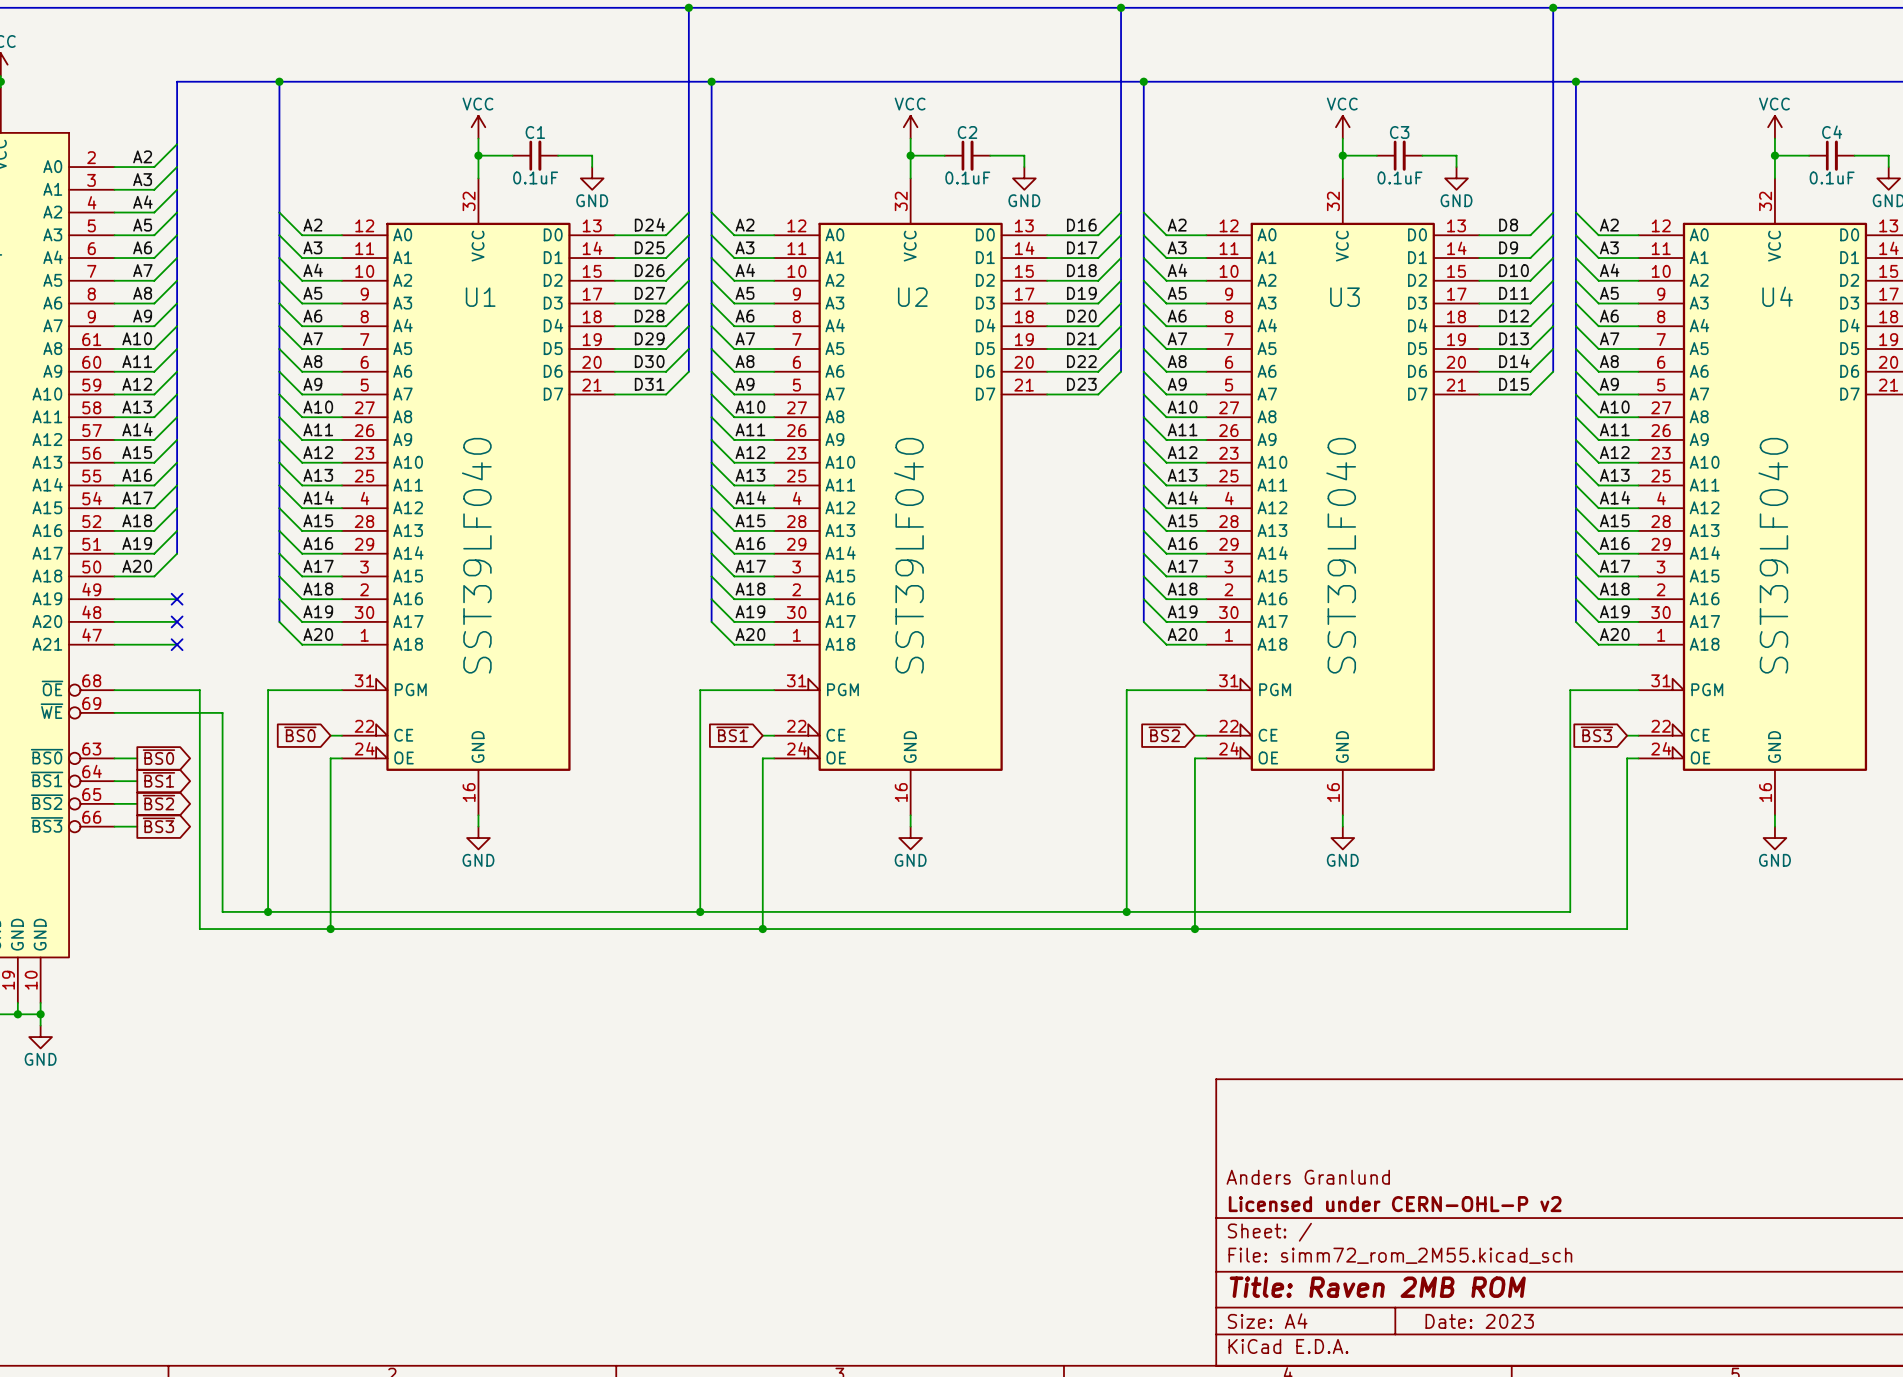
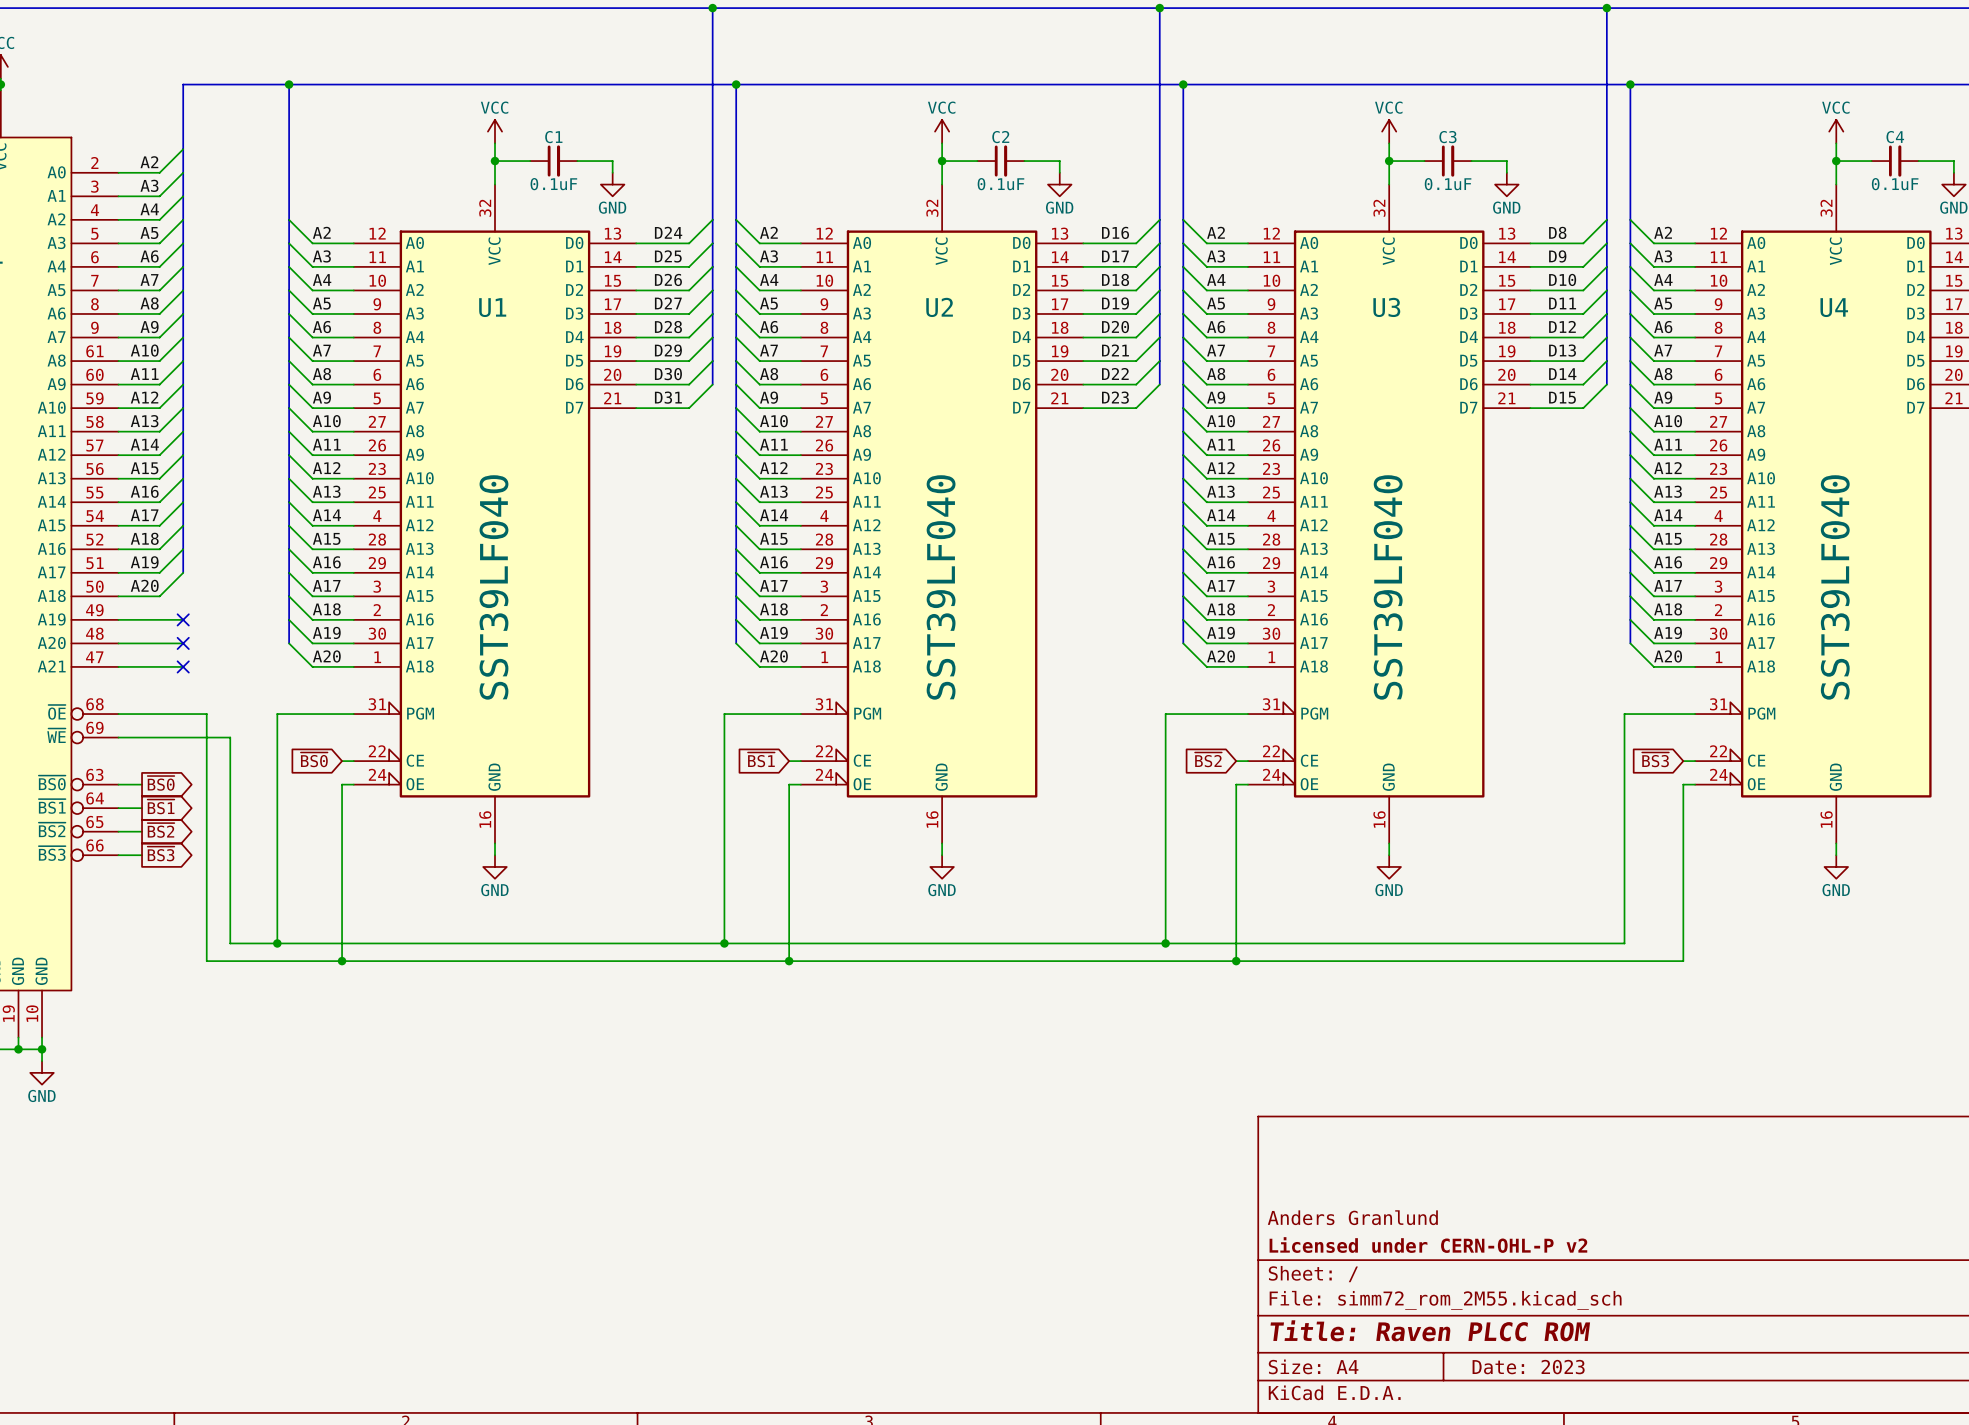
title block: Title: Raven 2MB ROM (1377, 1287) -> Title: Raven PLCC ROM (1430, 1330)

